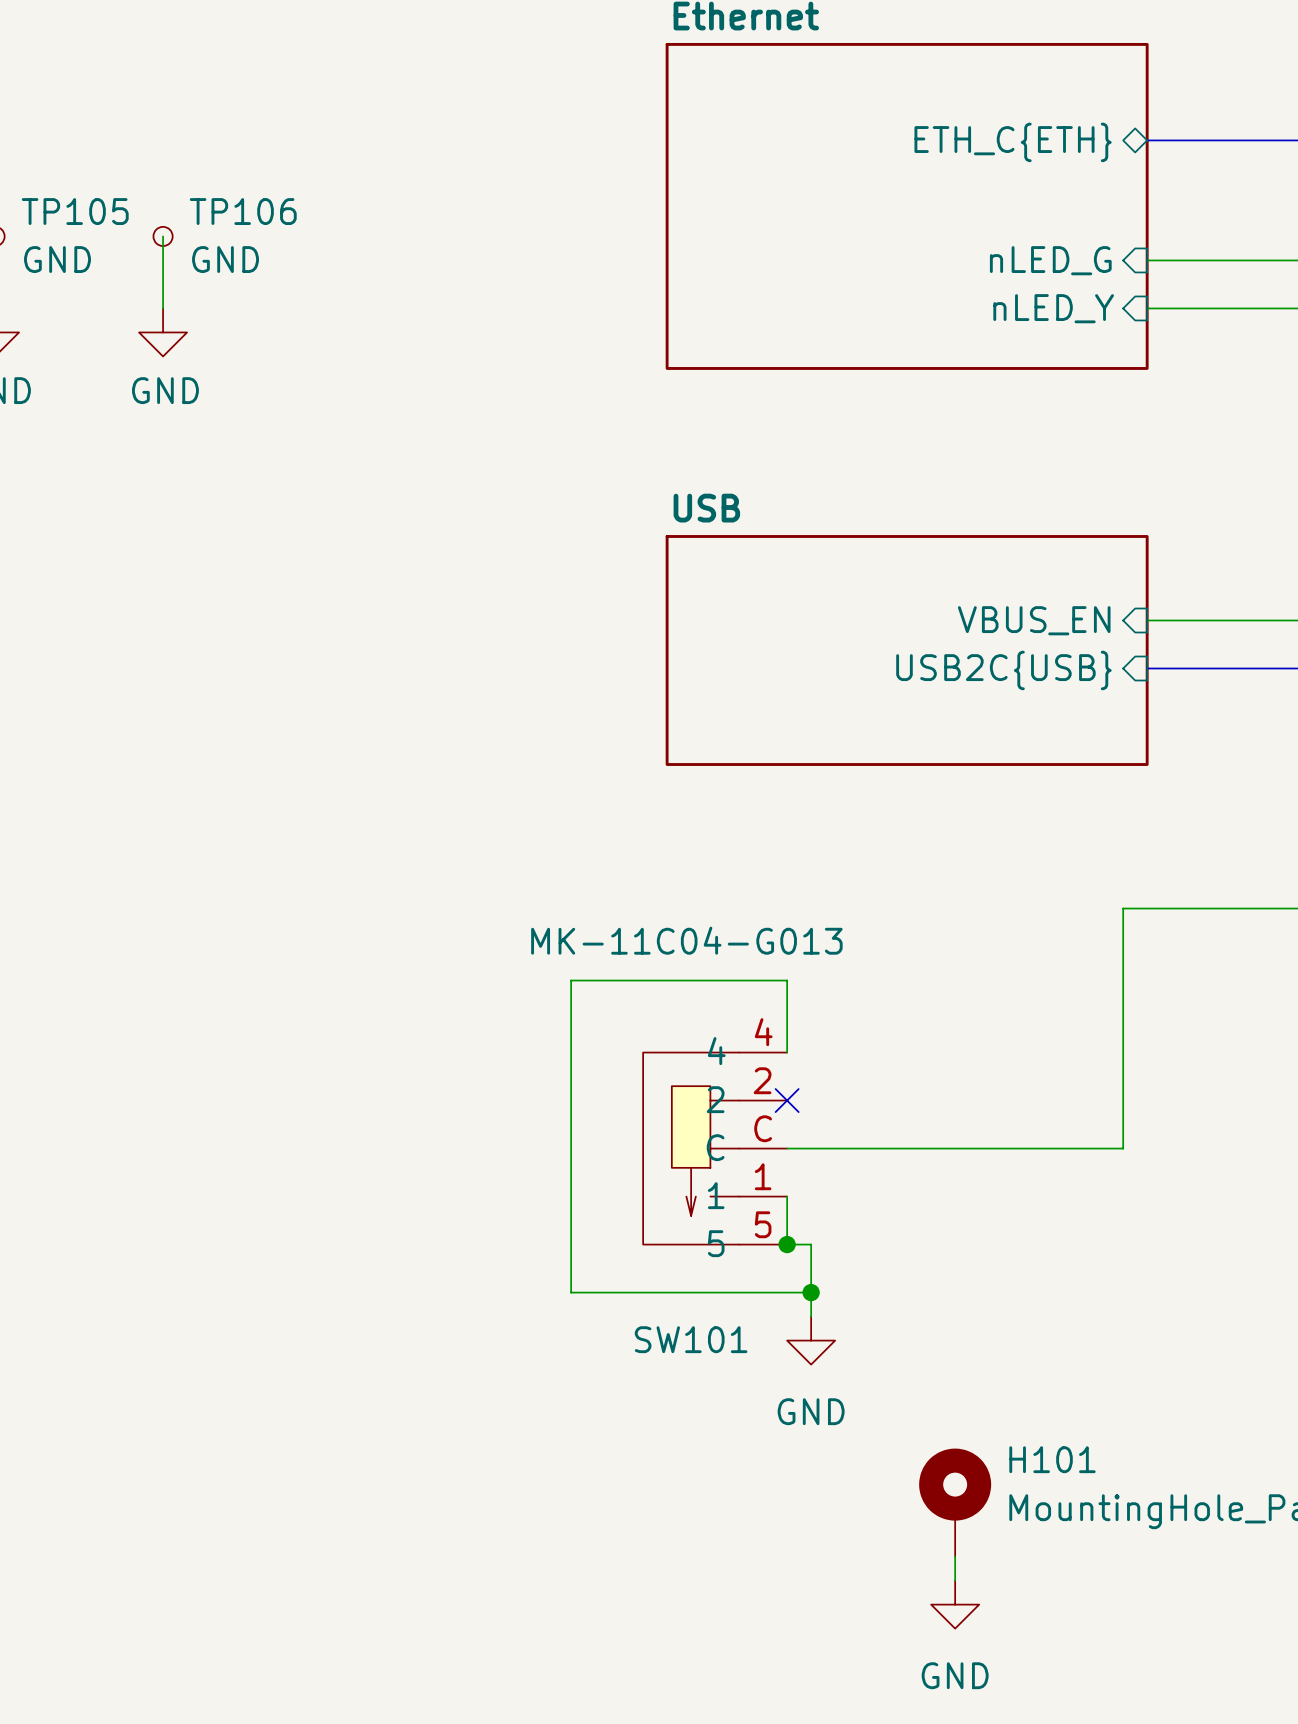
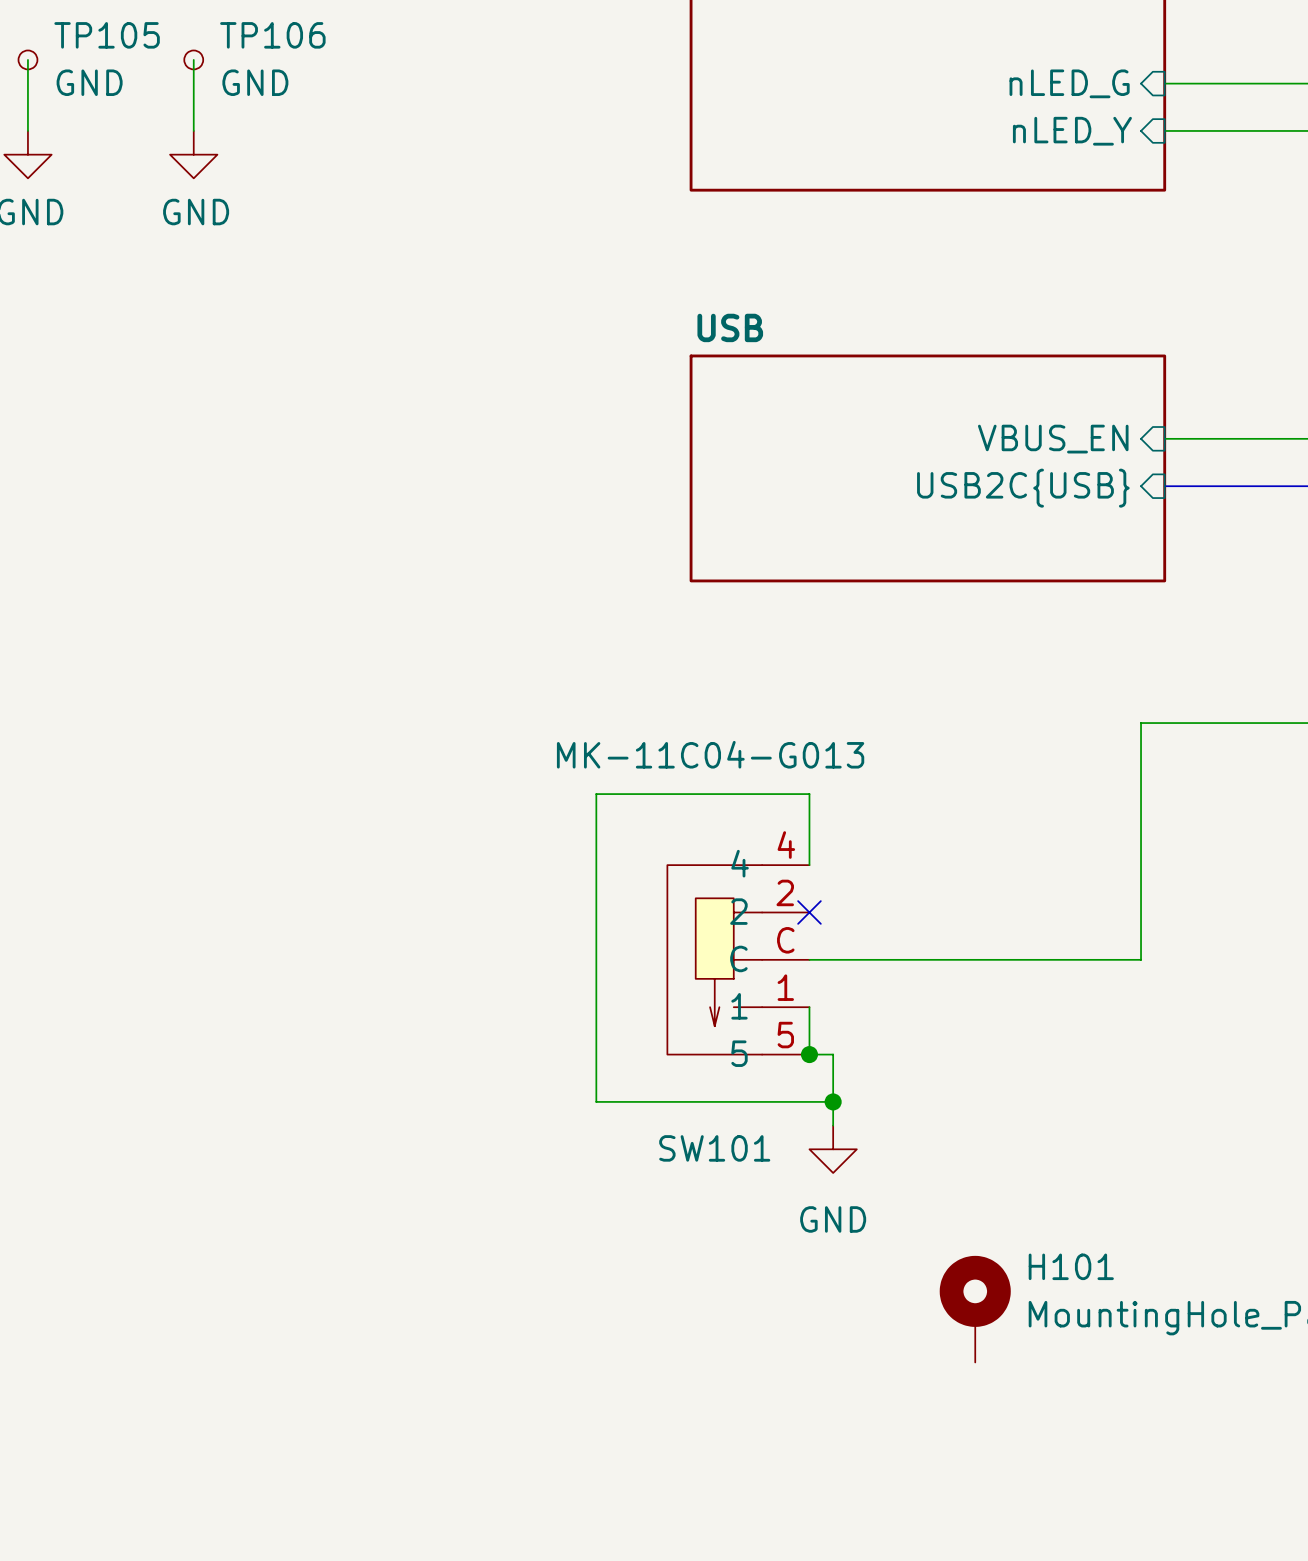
wire: (955, 1556) (955, 1580) -> none
power symbol: GND (955, 1604) -> none

